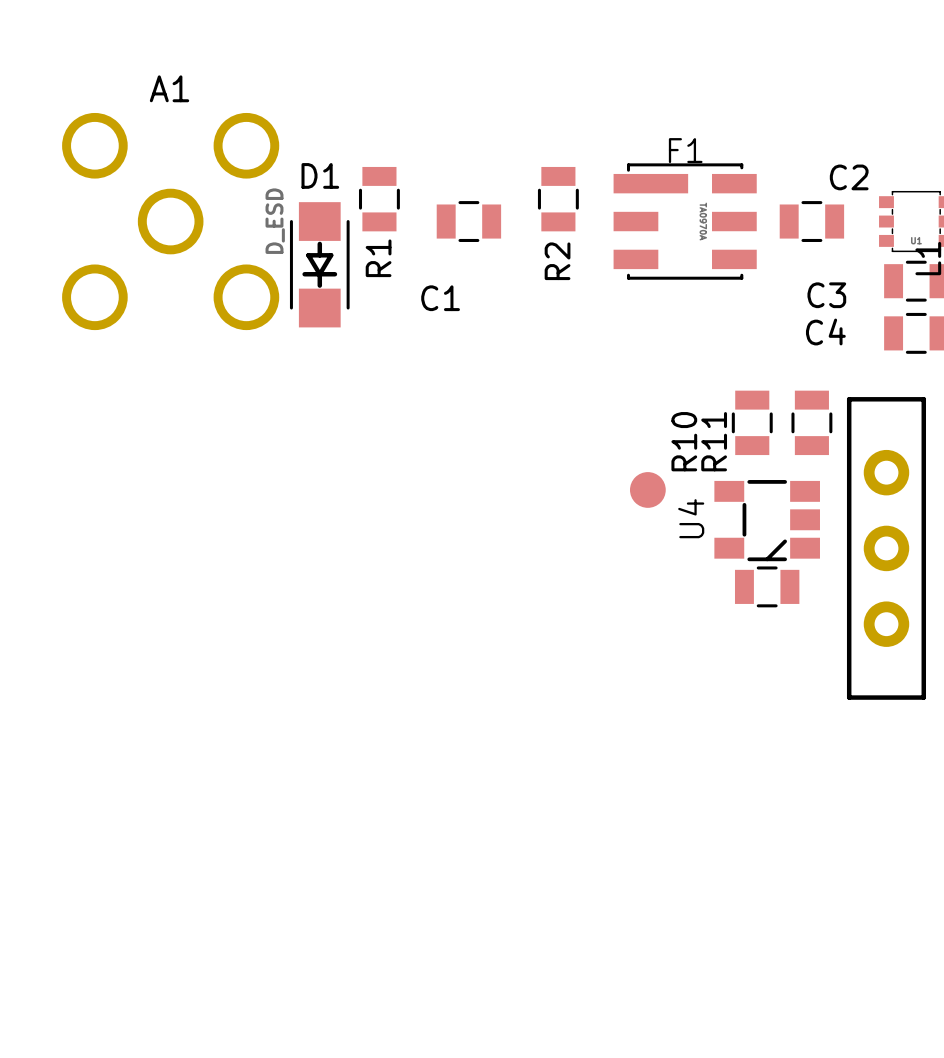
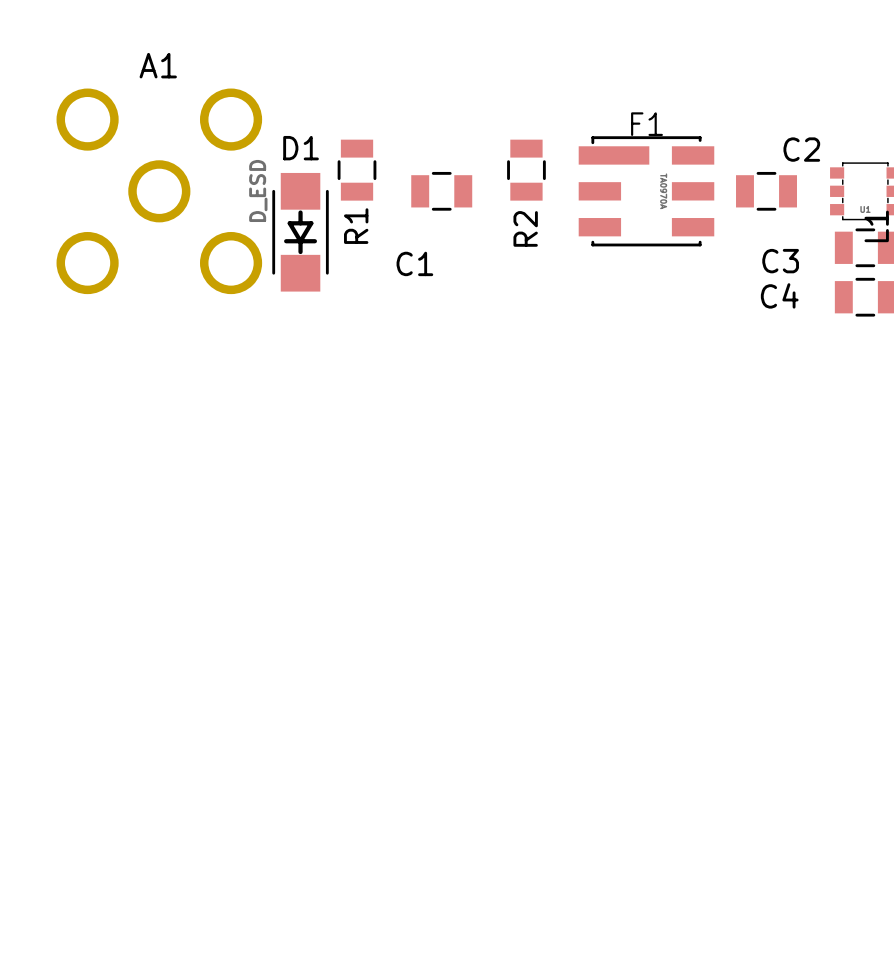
R10: (752, 422) -> none
R11: (811, 422) -> none
part: (647, 489) -> none
U4: (767, 520) -> none
part: (886, 548) -> none
part: (767, 586) -> none

